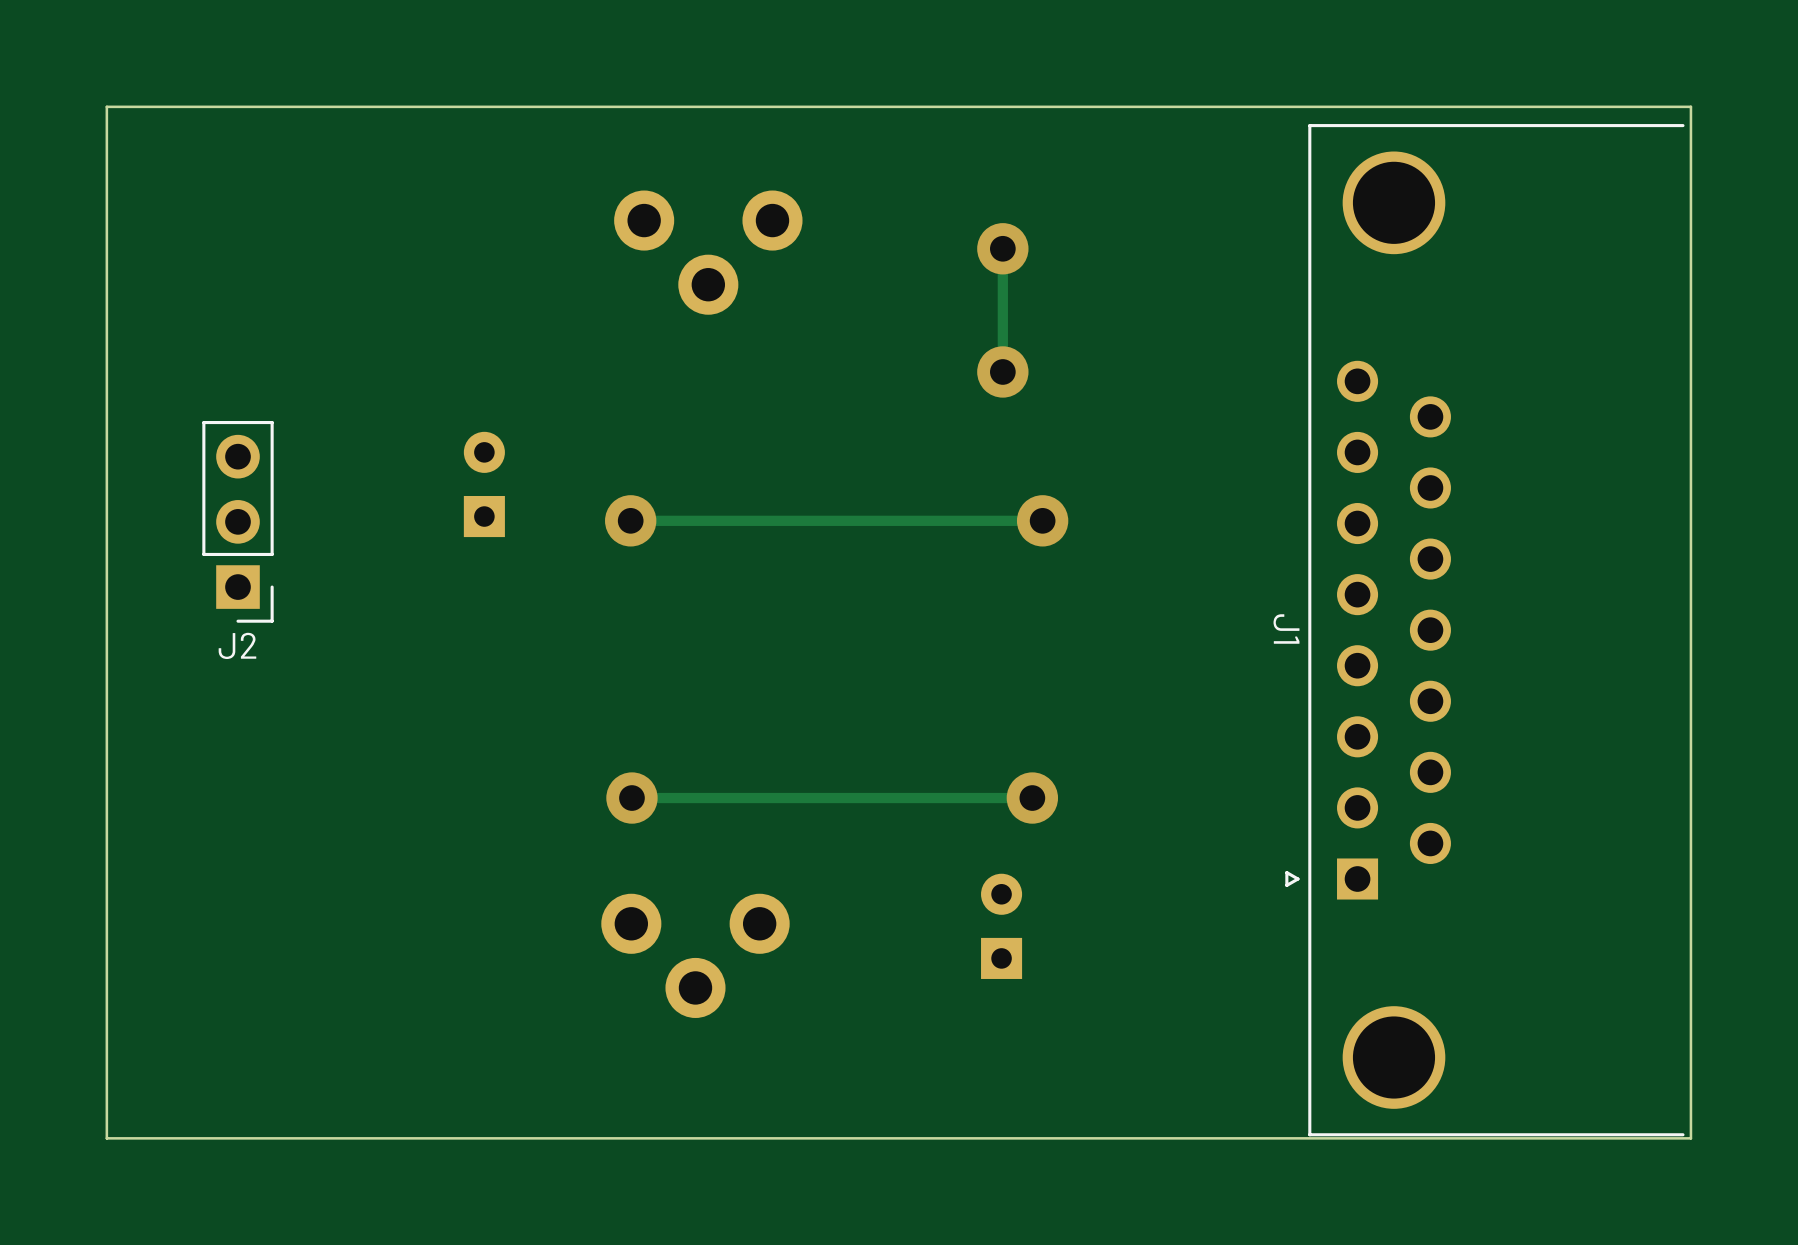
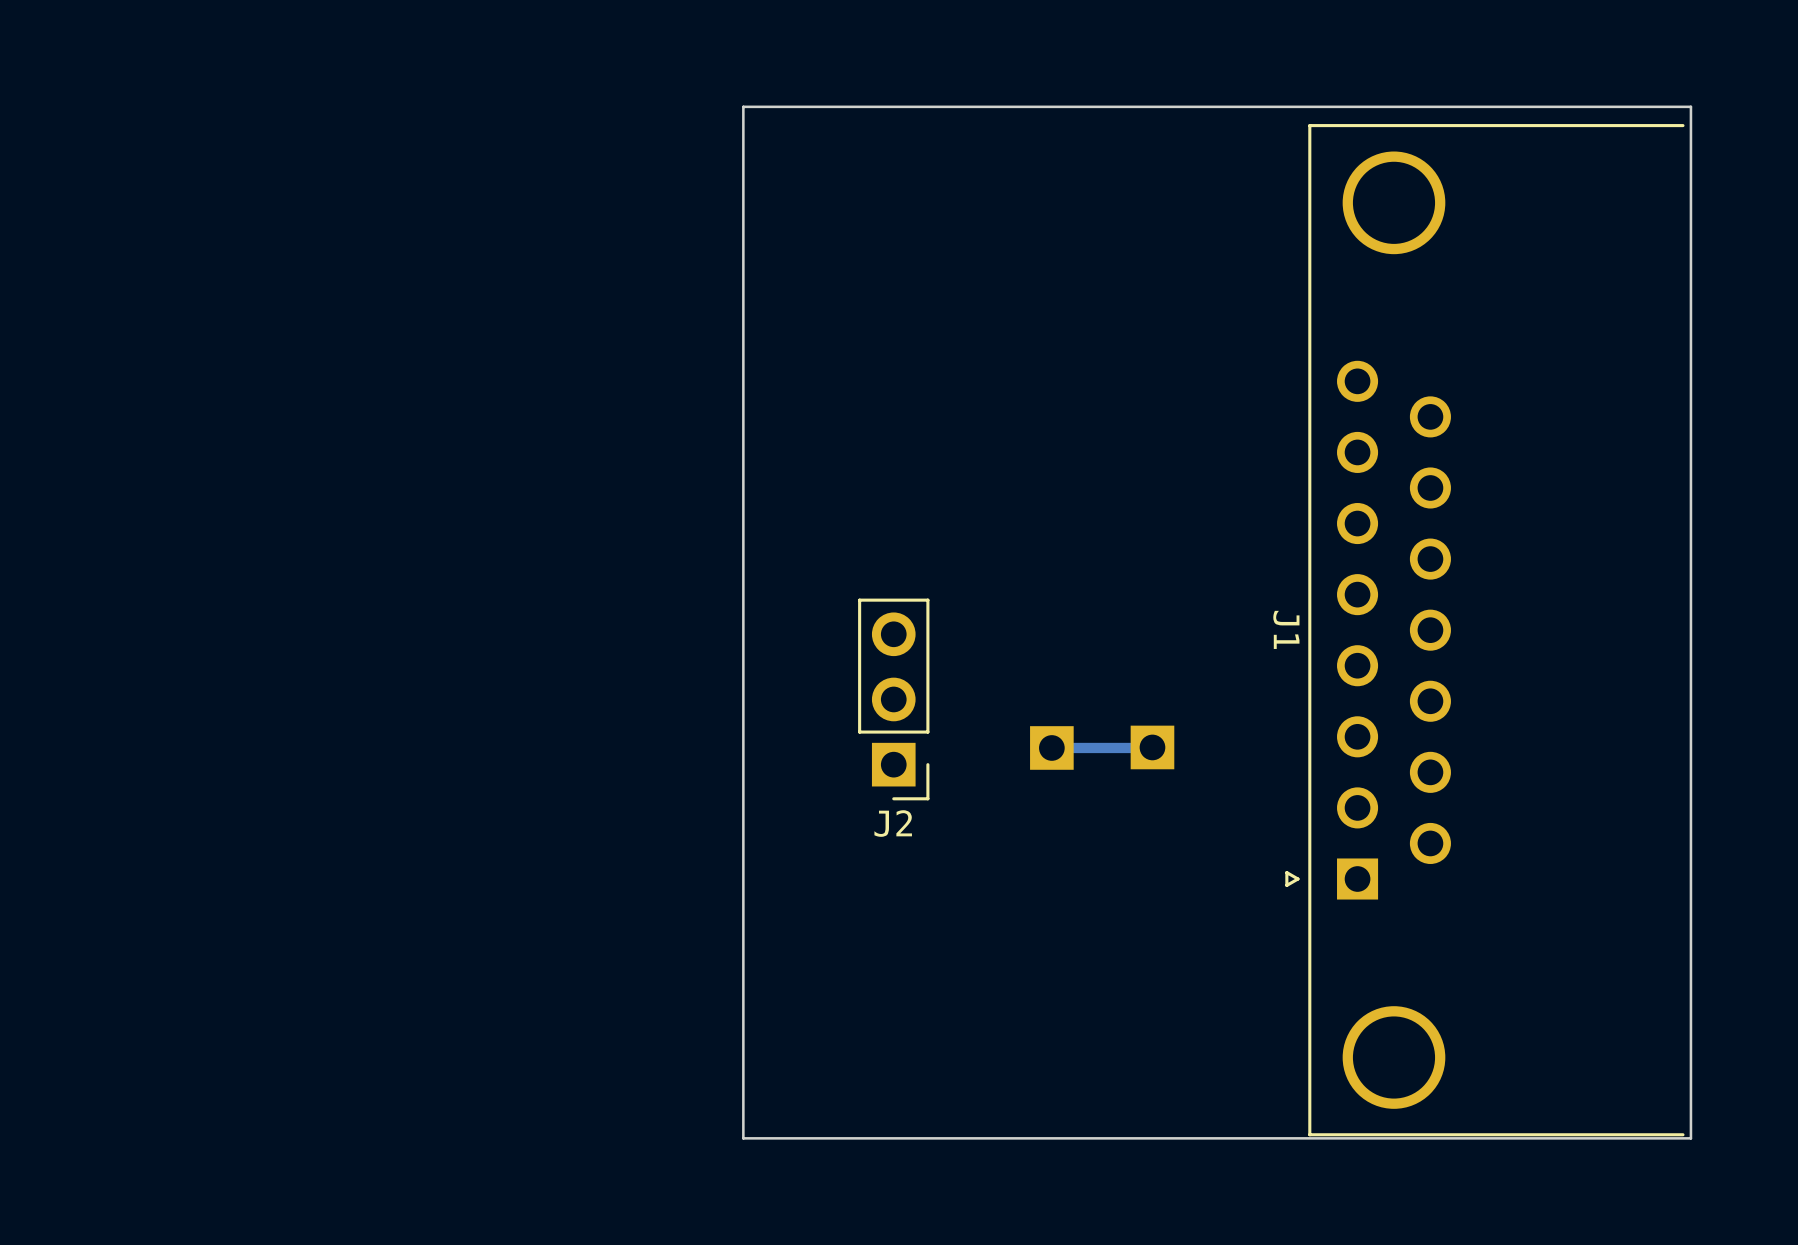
board edge: (743, 106) (106, 106) (106, 1138) (743, 1138) -> (743, 106) (743, 1138)
track: (1002, 248) (1002, 371) -> none
via: (1002, 248) -> none
part: (708, 252) -> none
via: (1002, 371) -> none
part: (484, 484) -> none
via: (630, 520) -> none
track: (1042, 520) (630, 520) -> none
via: (1042, 520) -> none
J2 position: (237, 521) -> (893, 699)
part: none -> (1051, 747)
track: none -> (1152, 747) (1051, 747)
part: none -> (1152, 747)
via: (631, 798) -> none
track: (1032, 798) (631, 798) -> none
via: (1032, 798) -> none
part: (1001, 926) -> none
part: (695, 955) -> none

